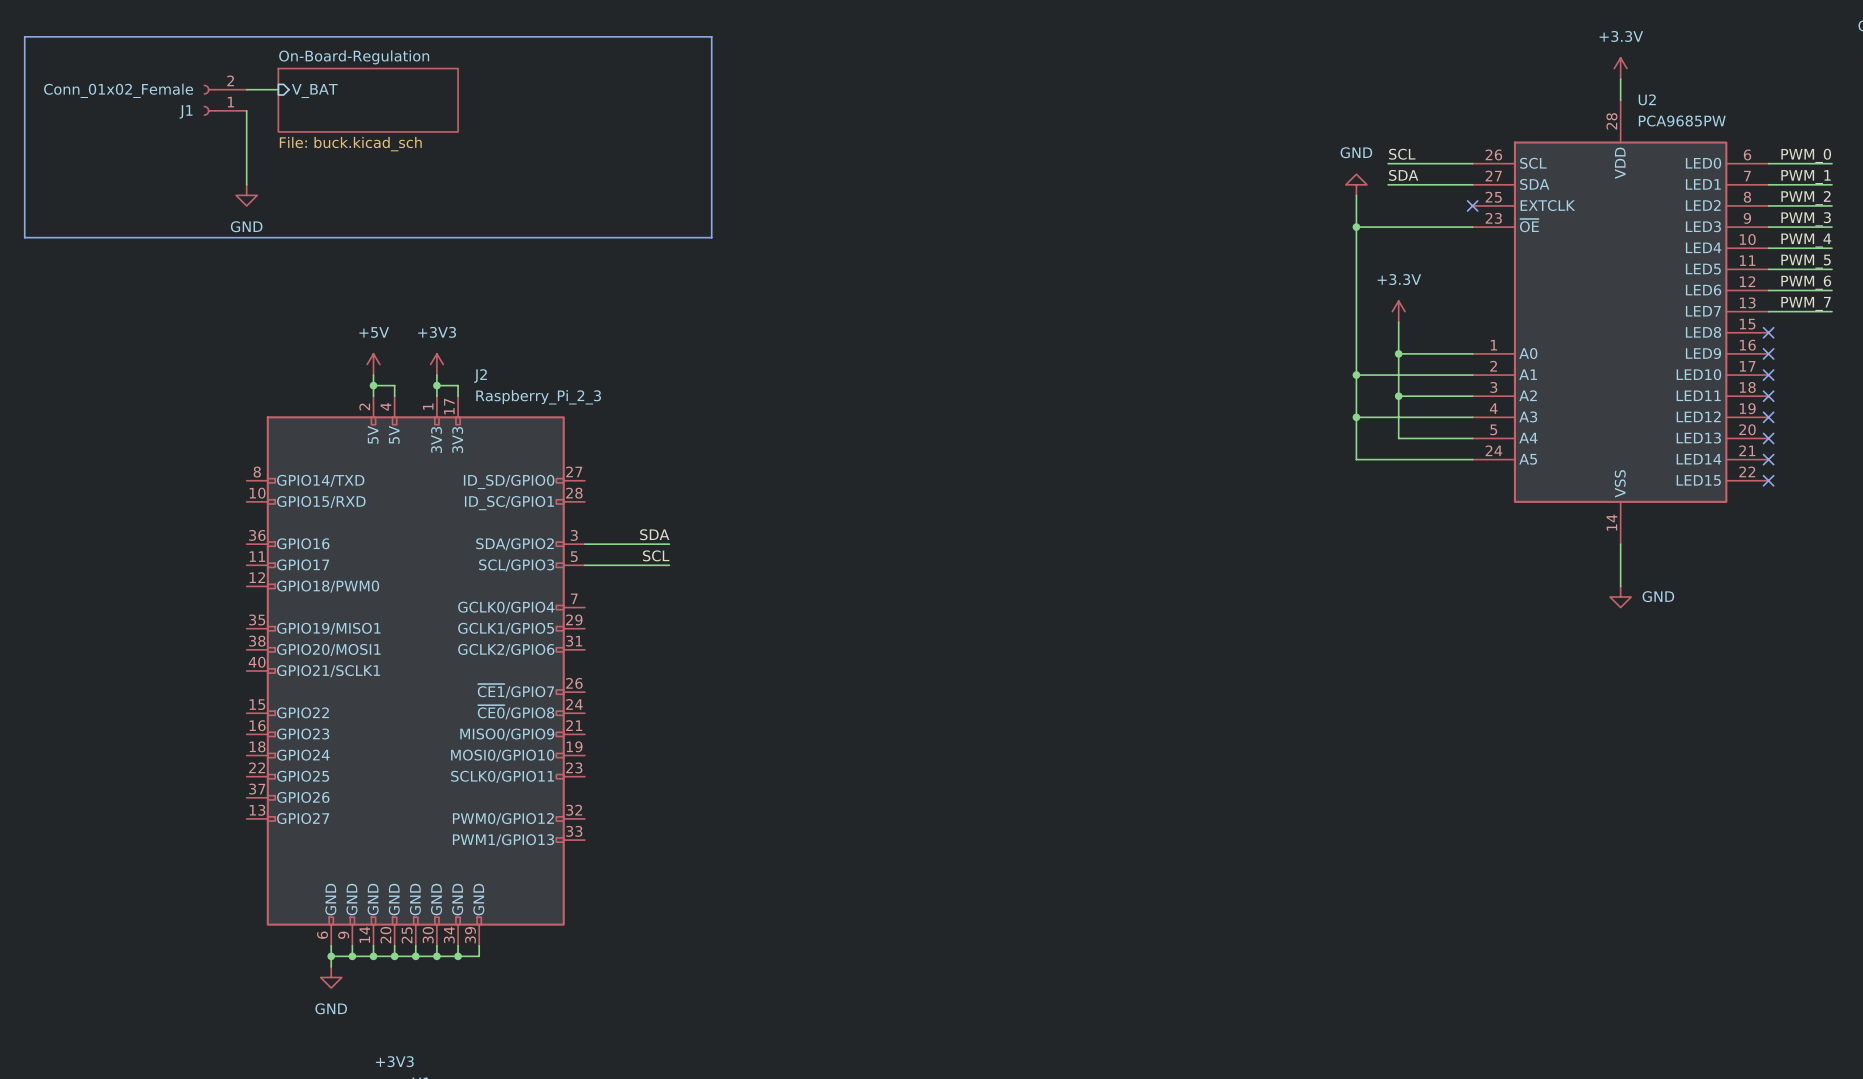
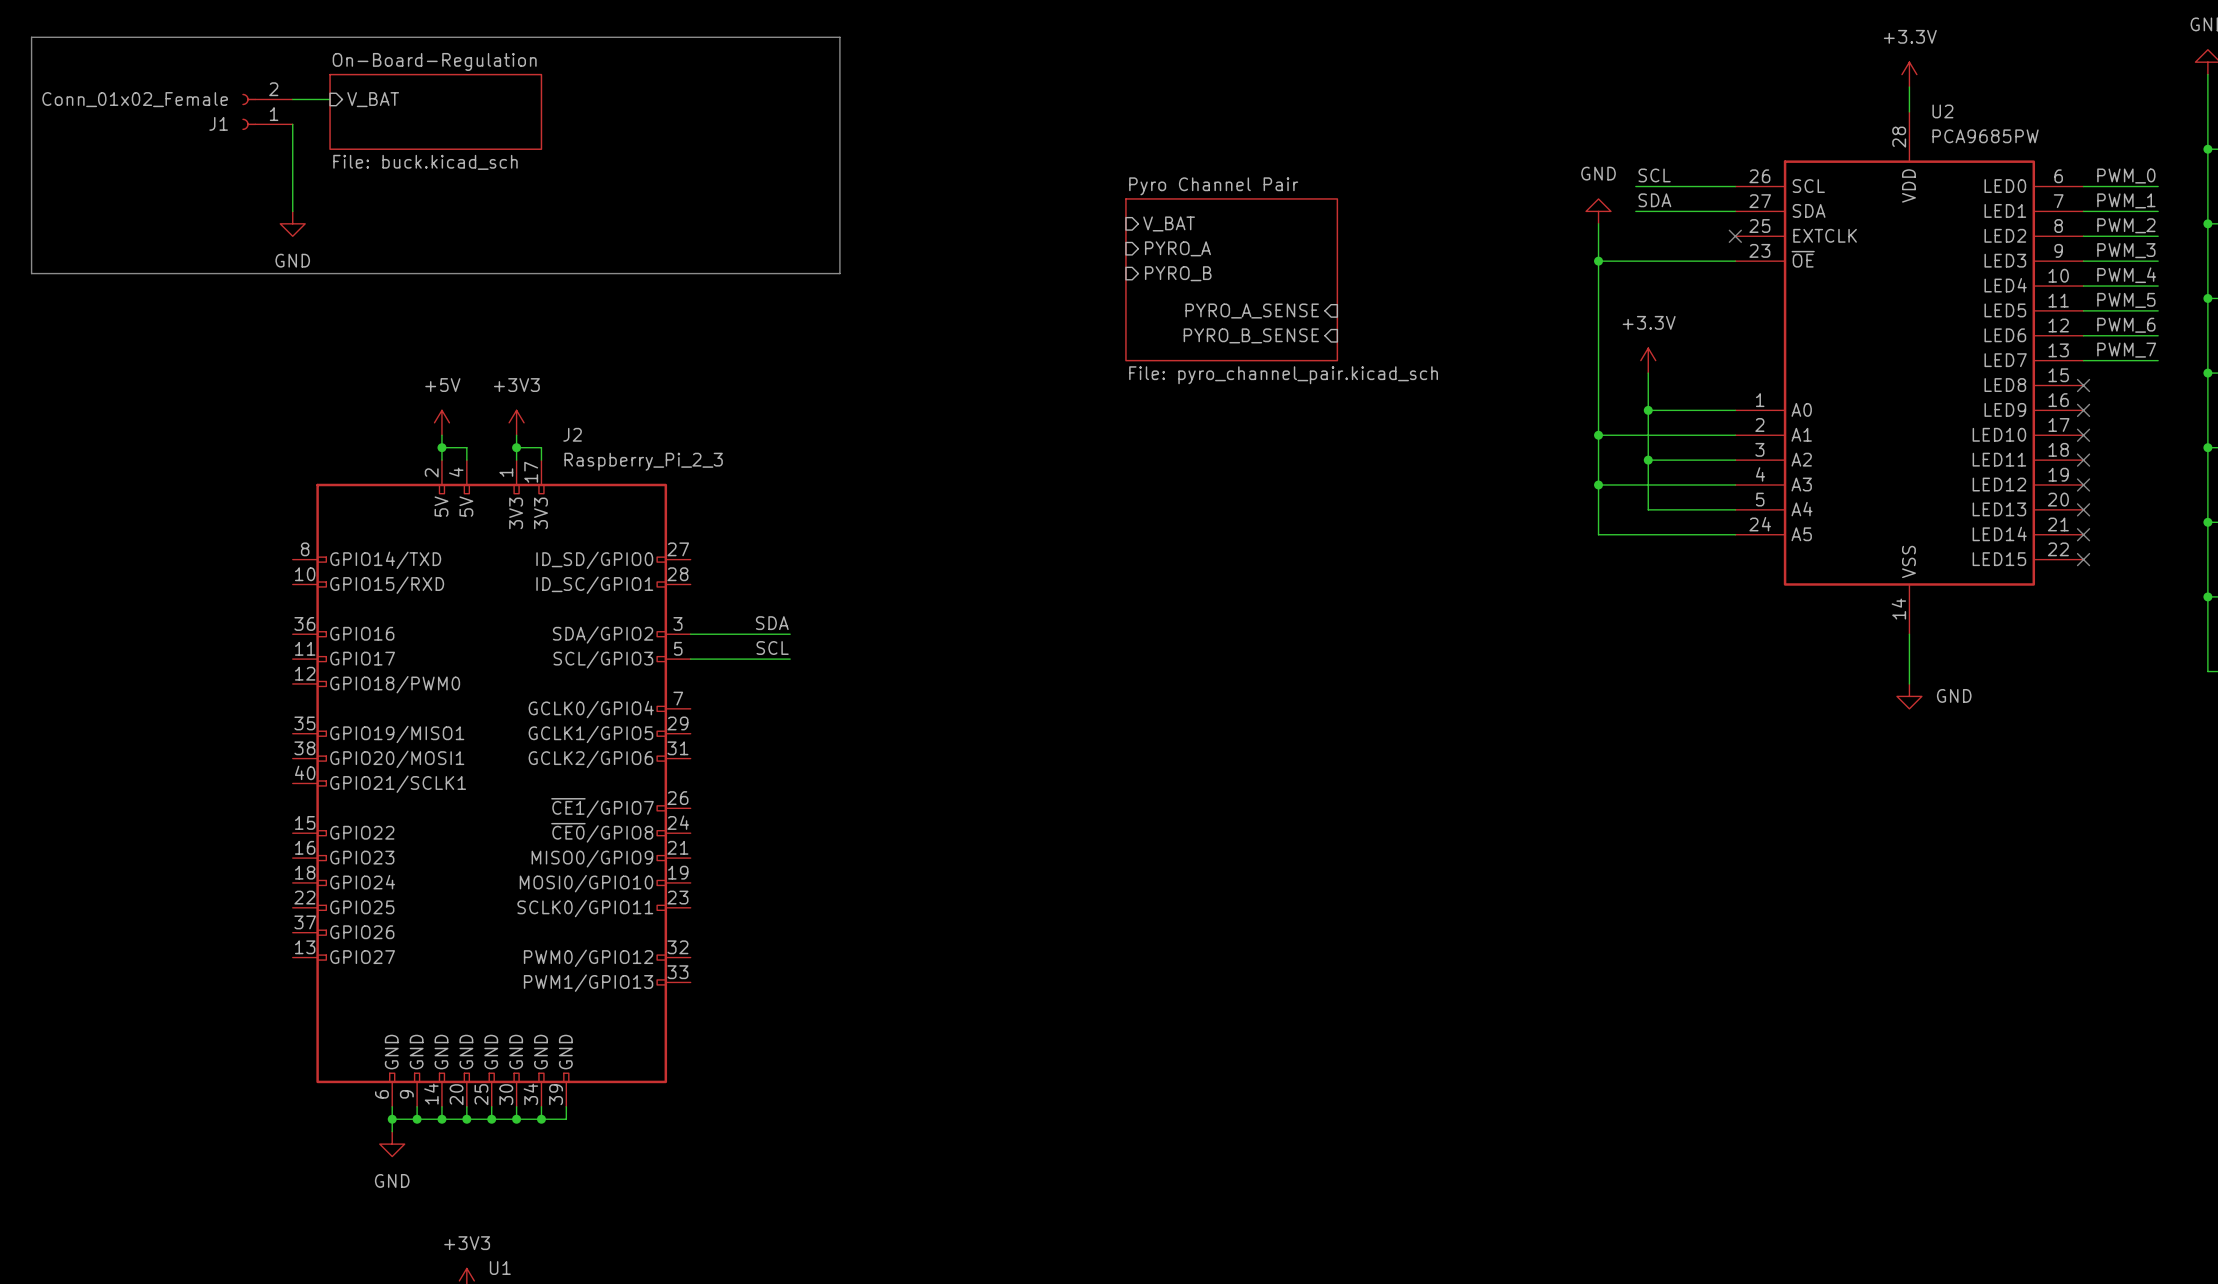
sheet pin: none -> V_BAT (1169, 223)
sheet pin: none -> PYRO_A (1177, 248)
sheet pin: none -> PYRO_B (1178, 273)
sheet Pyro Channel Pair: none -> File: pyro_channel_pair.kicad_sch (1231, 279)
sheet pin: none -> PYRO_A_SENSE (1252, 311)
sheet pin: none -> PYRO_B_SENSE (1251, 335)

